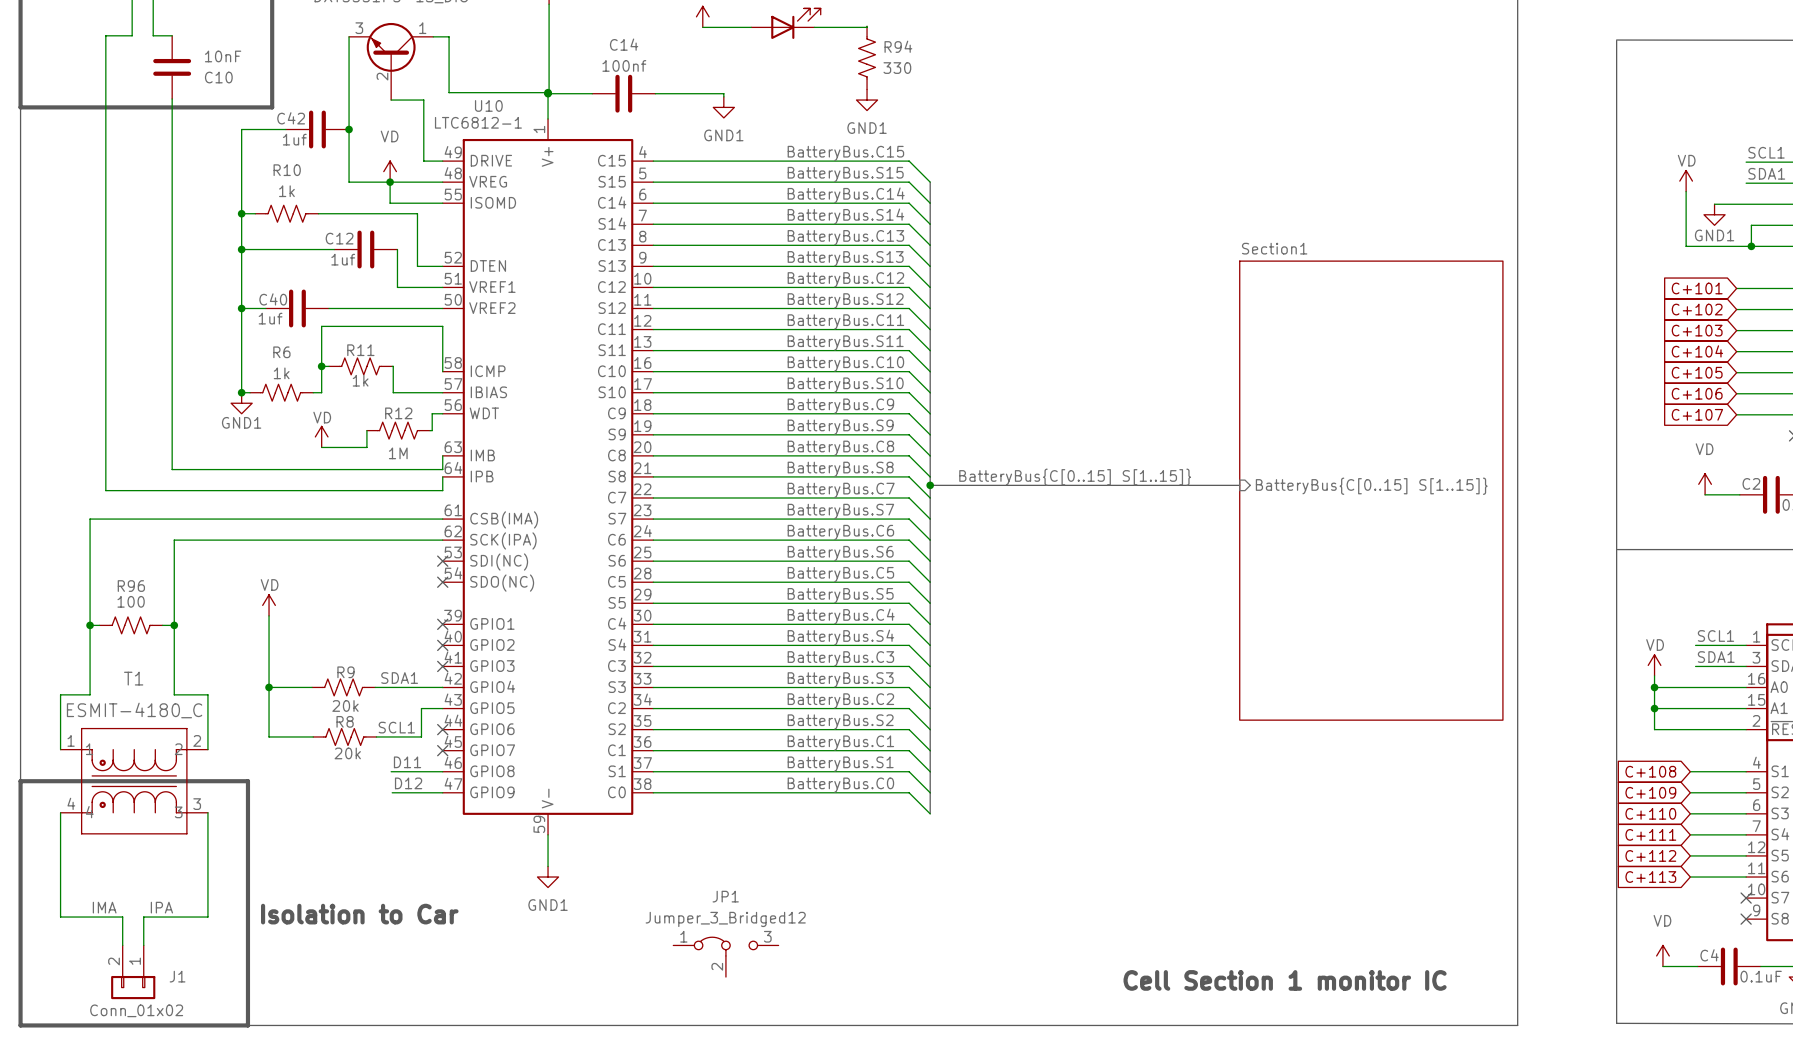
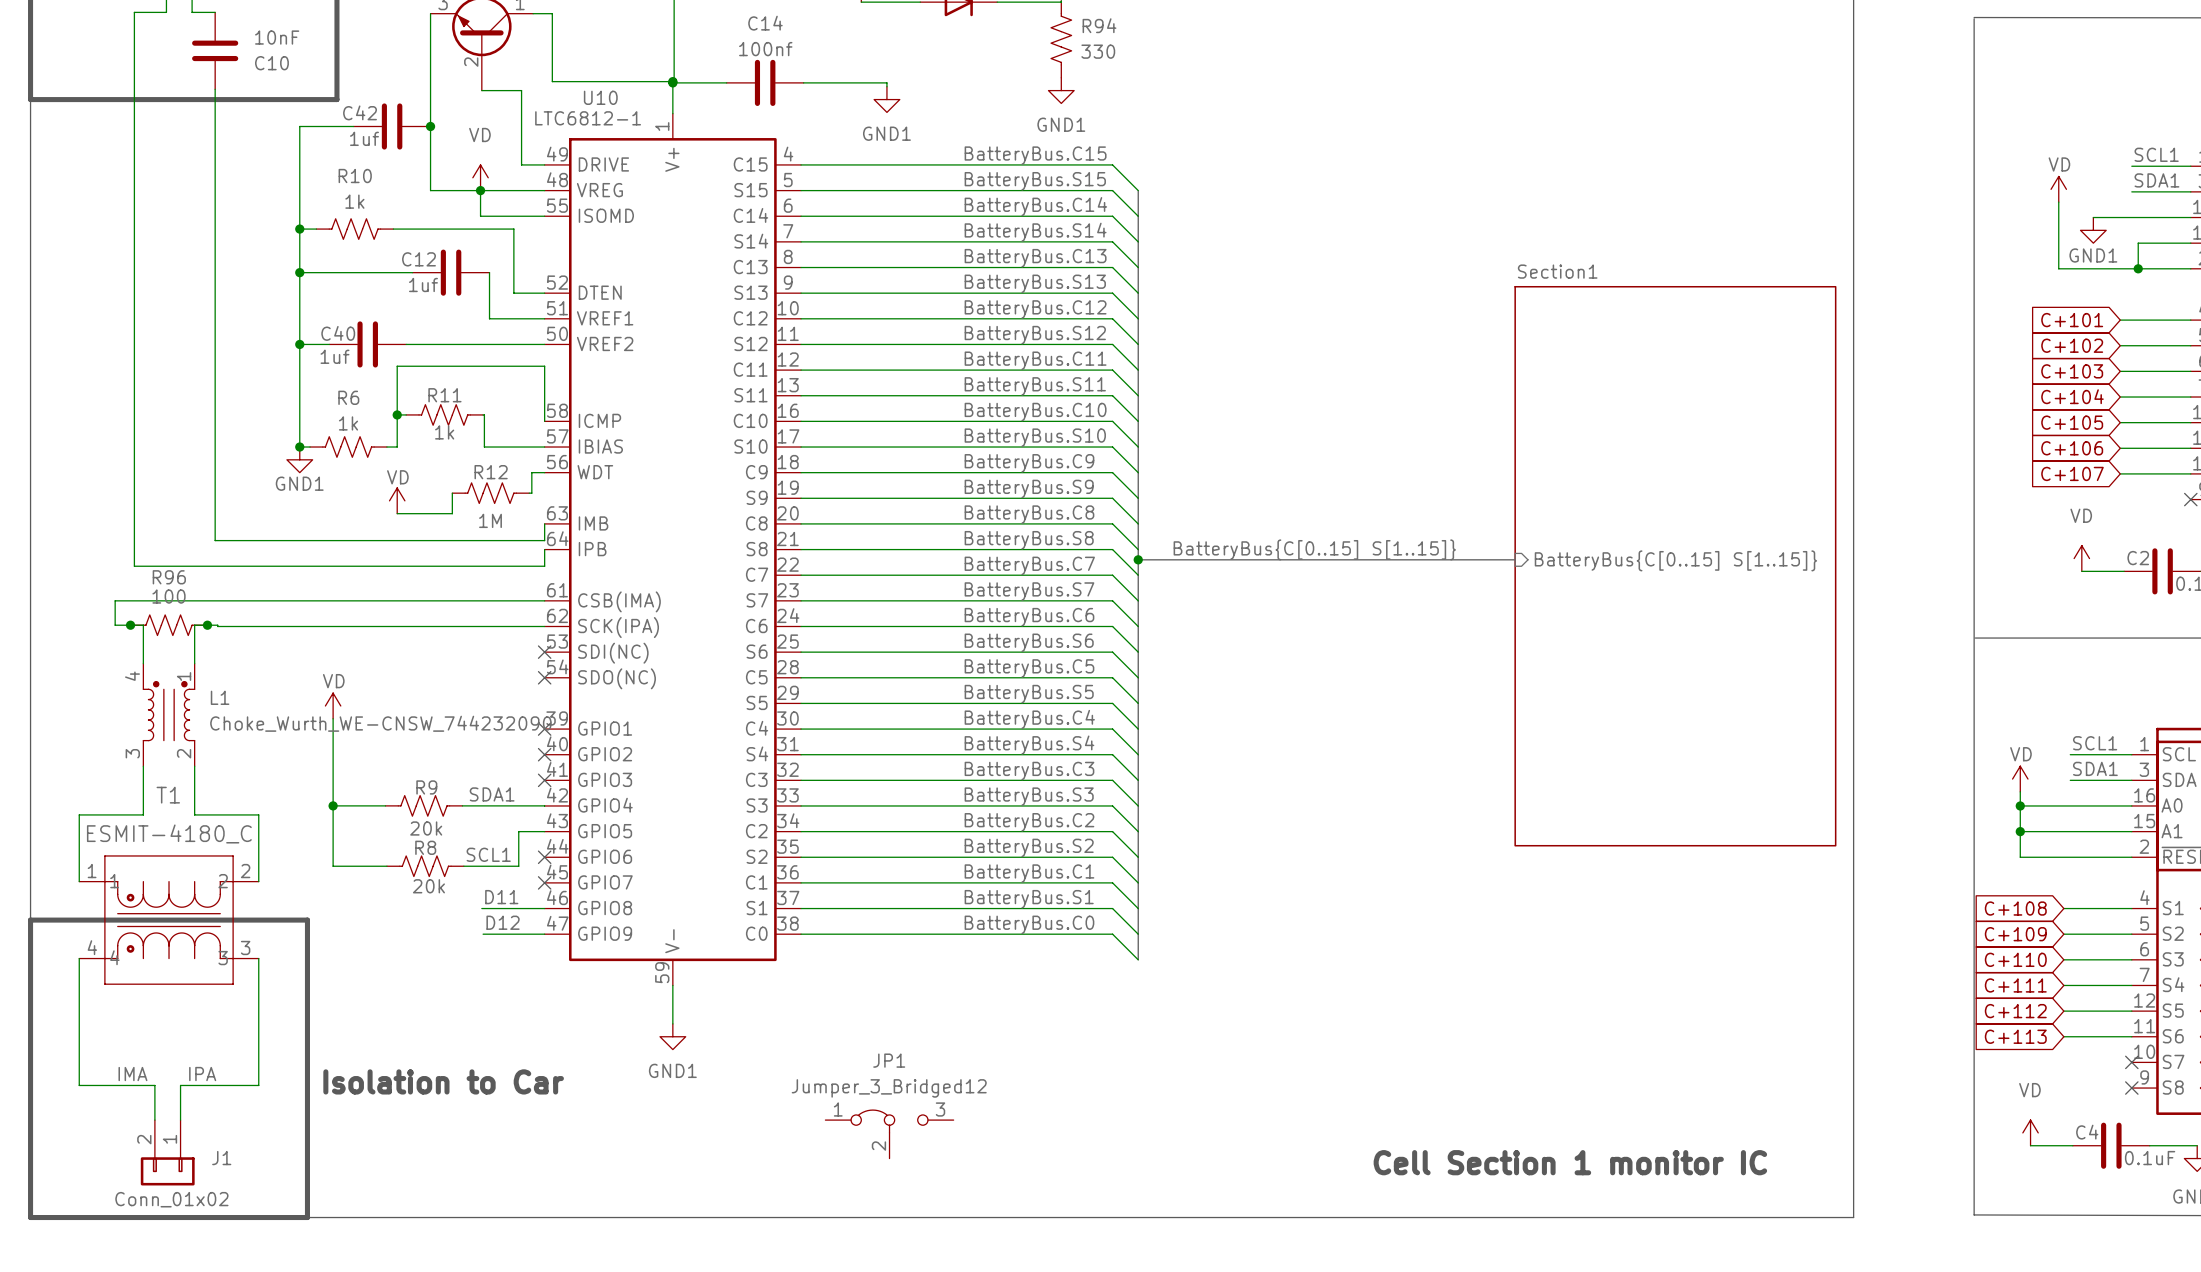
wire: (90, 539) (90, 694) -> (143, 766) (143, 814) (115, 814)
wire: none -> (115, 625) (143, 625) (143, 663)
junction: none -> (130, 625)
junction: none -> (207, 625)
wire: (174, 540) (174, 694) -> (194, 766) (194, 814) (217, 814)
wire: none -> (217, 626) (194, 625) (194, 663)
L1: none -> Choke_Wurth_WE-CNSW_744232090 (169, 714)
wire: (90, 625) (99, 625) -> none
junction: (90, 625) -> none
R96 position: (131, 625) -> (169, 625)
wire: (162, 625) (174, 625) -> none
junction: (174, 625) -> none

